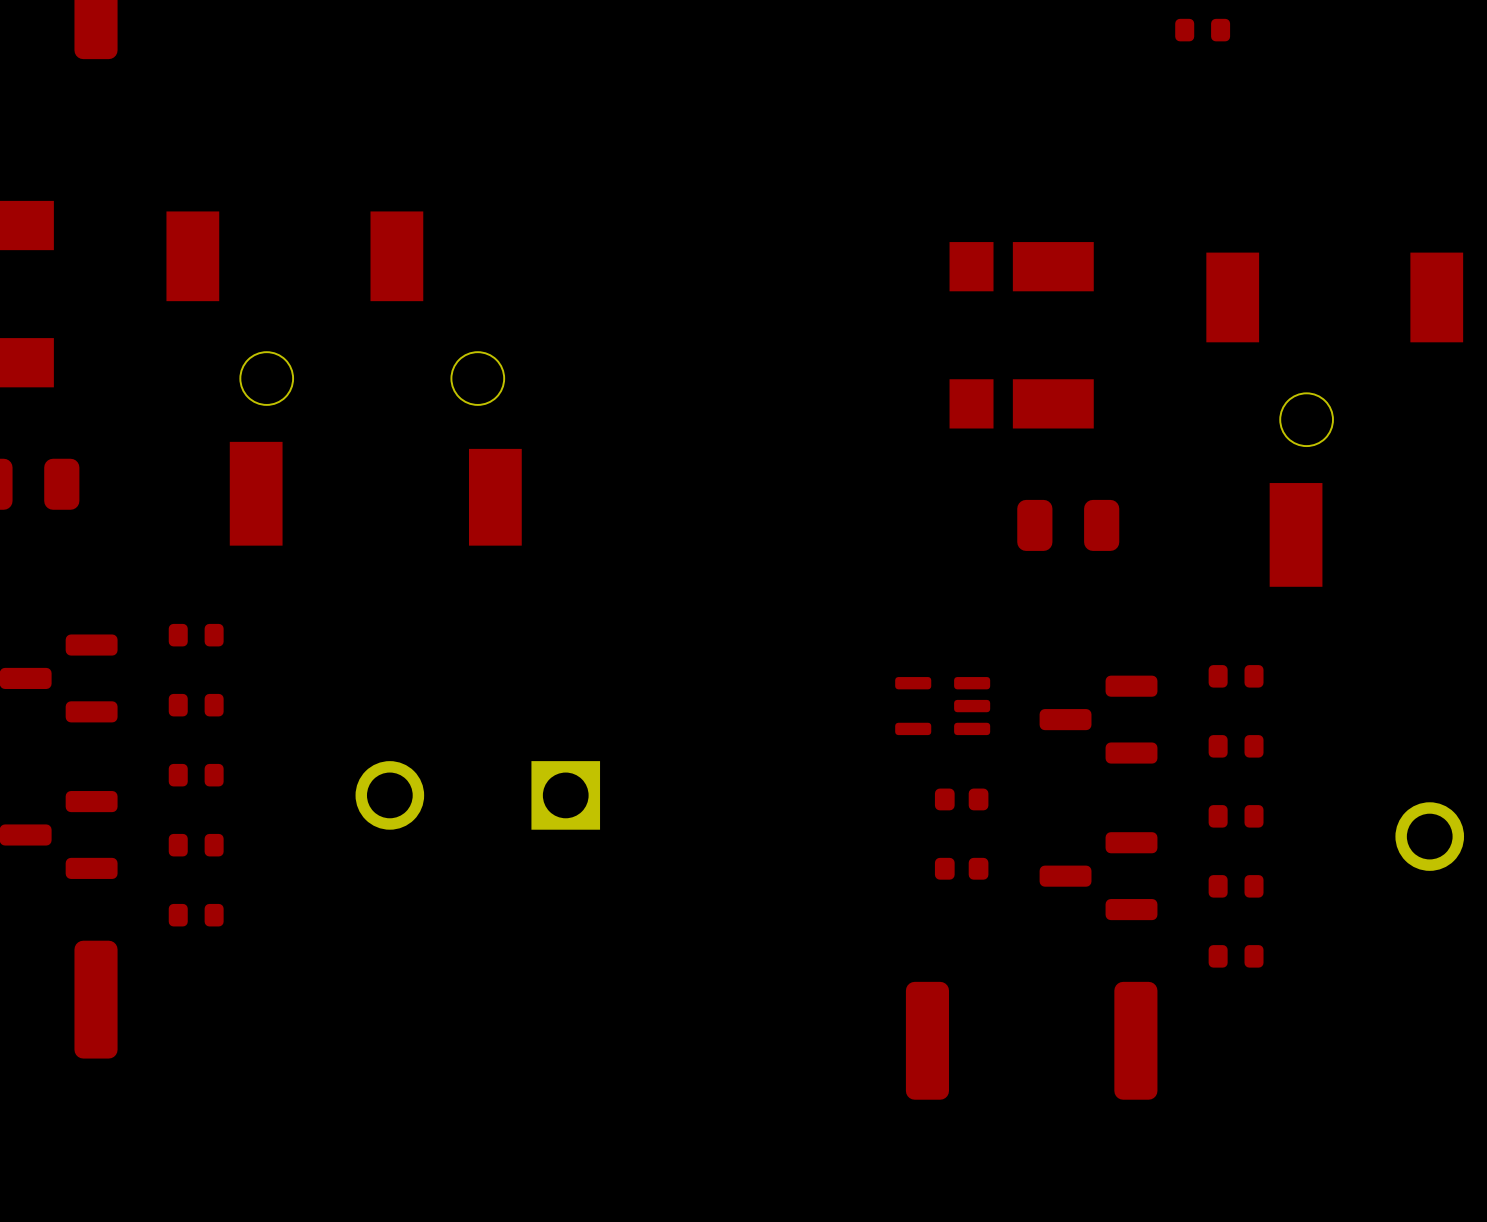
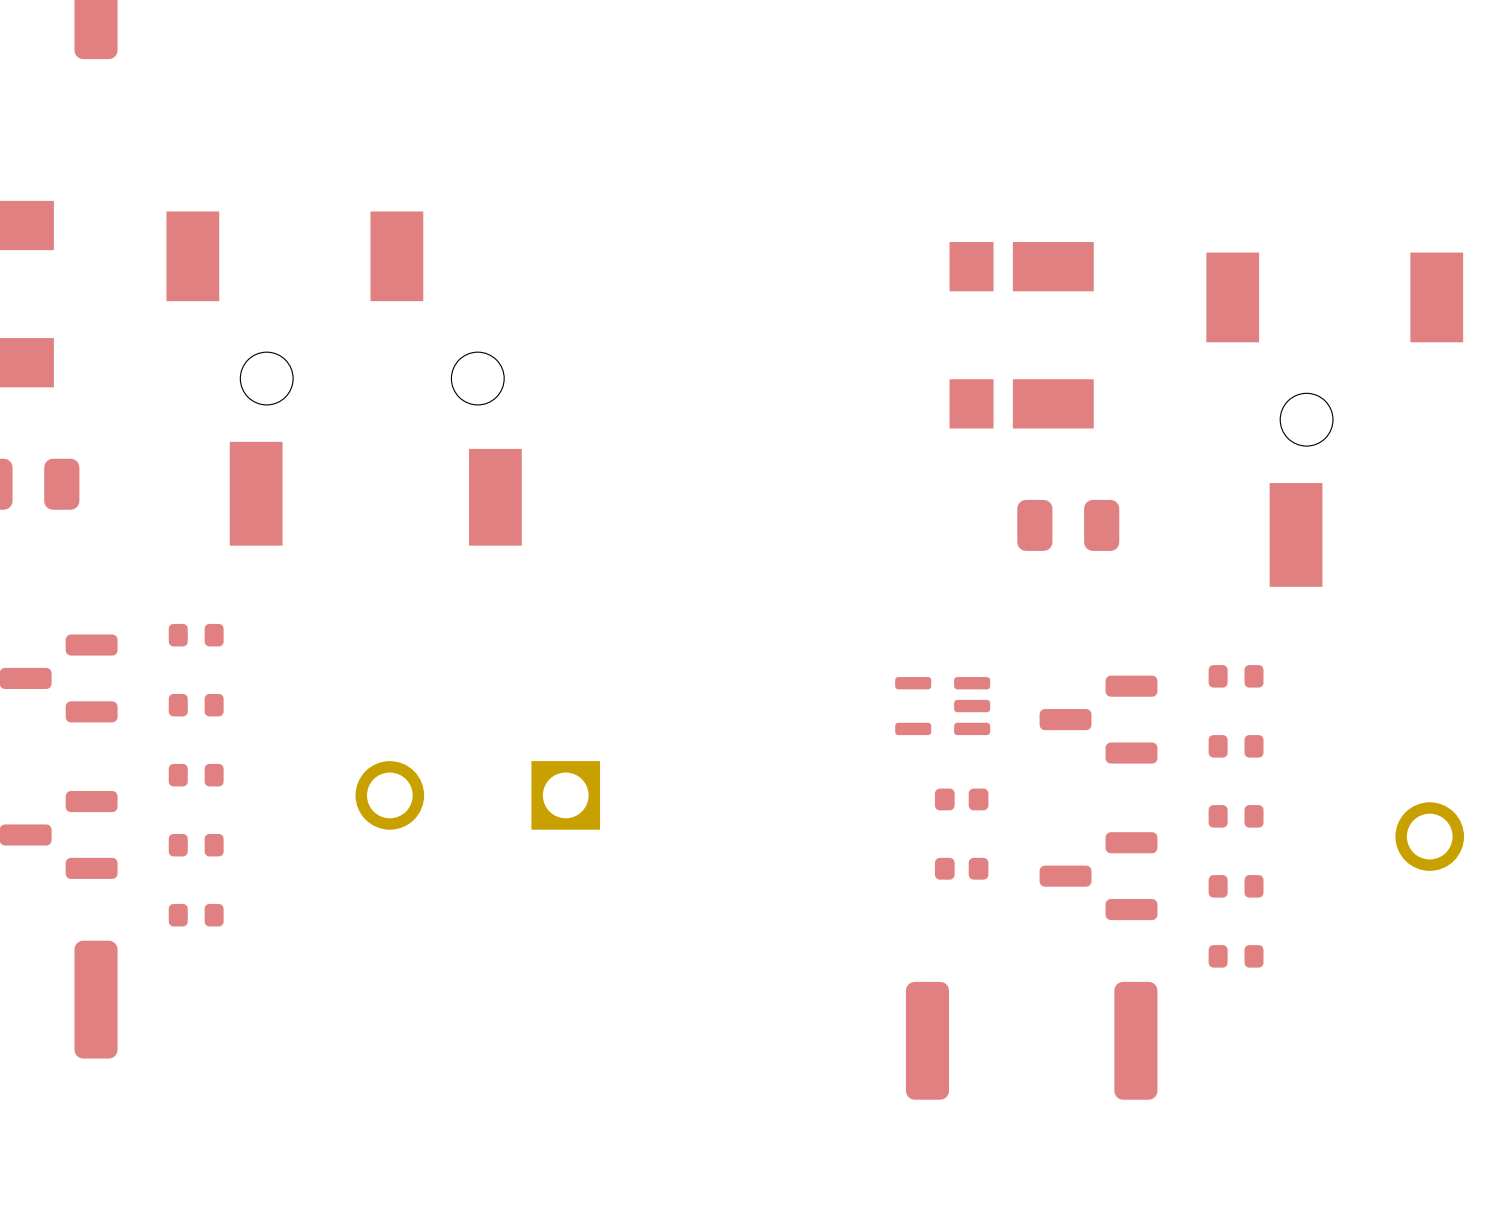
part: (1202, 30) -> none

